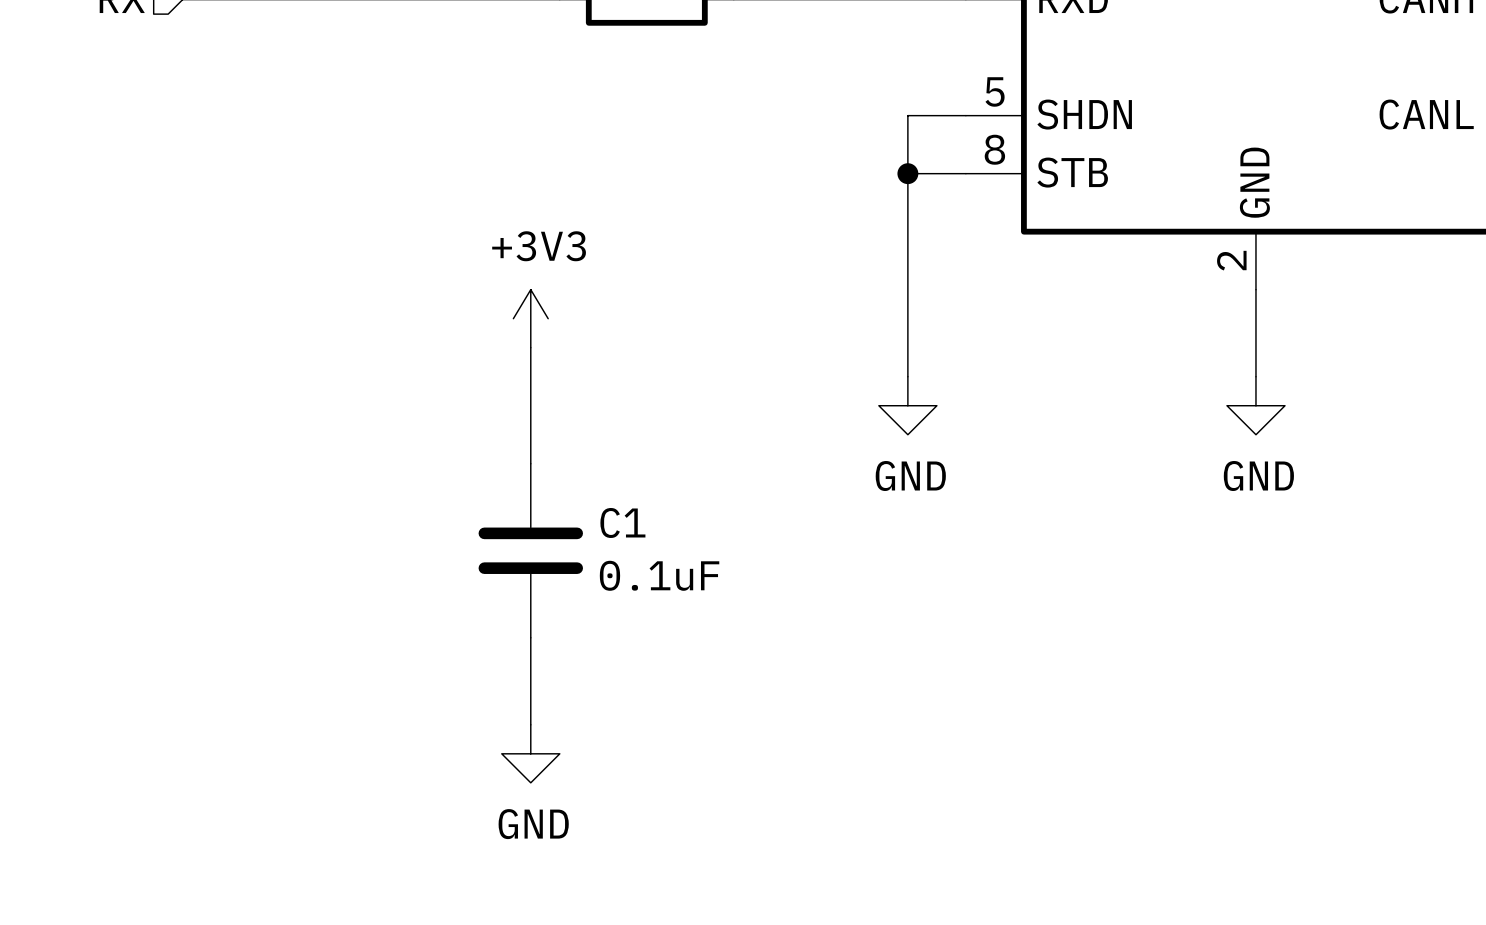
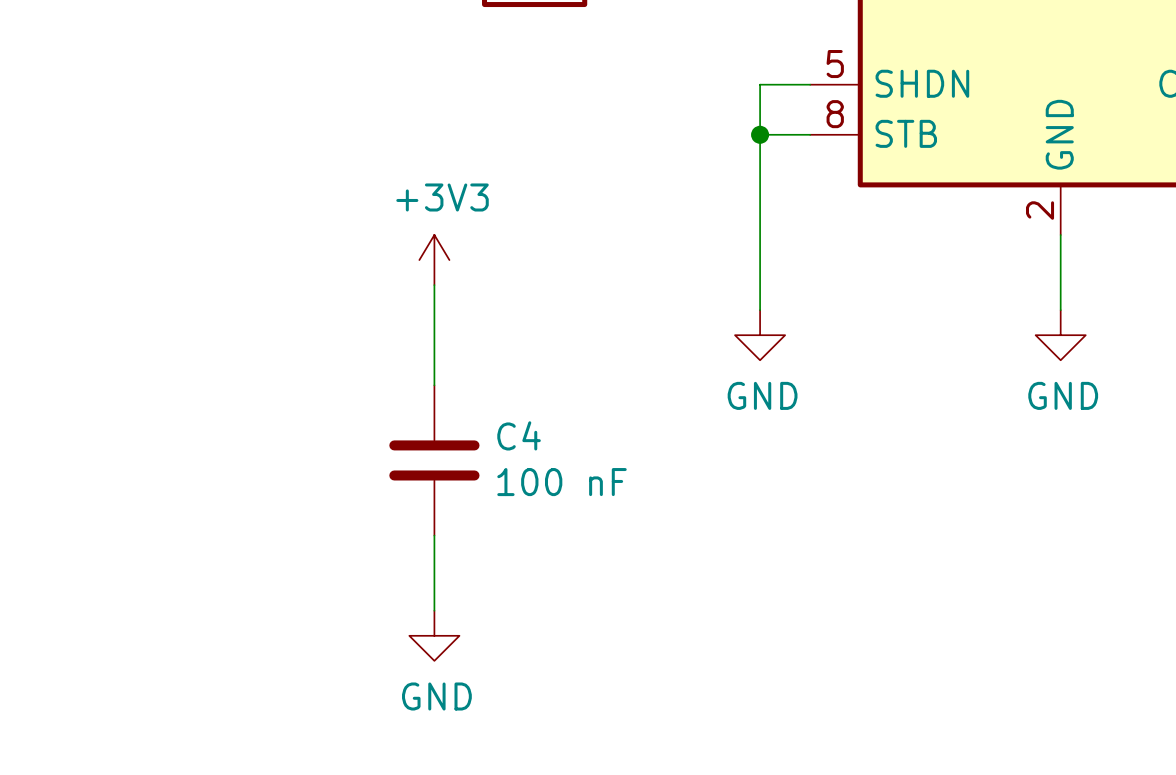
C1 name: C1 (622, 522) -> C4 (519, 435)
C1 value: 0.1uF (659, 575) -> 100 nF (562, 482)

